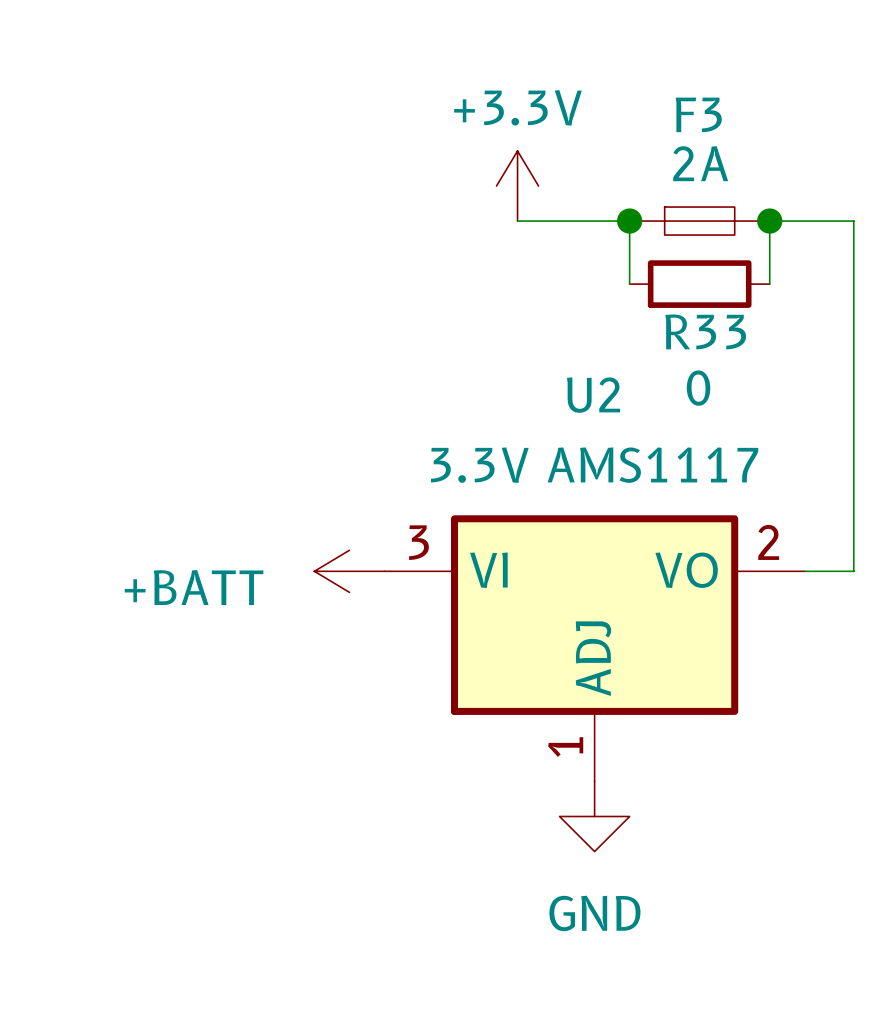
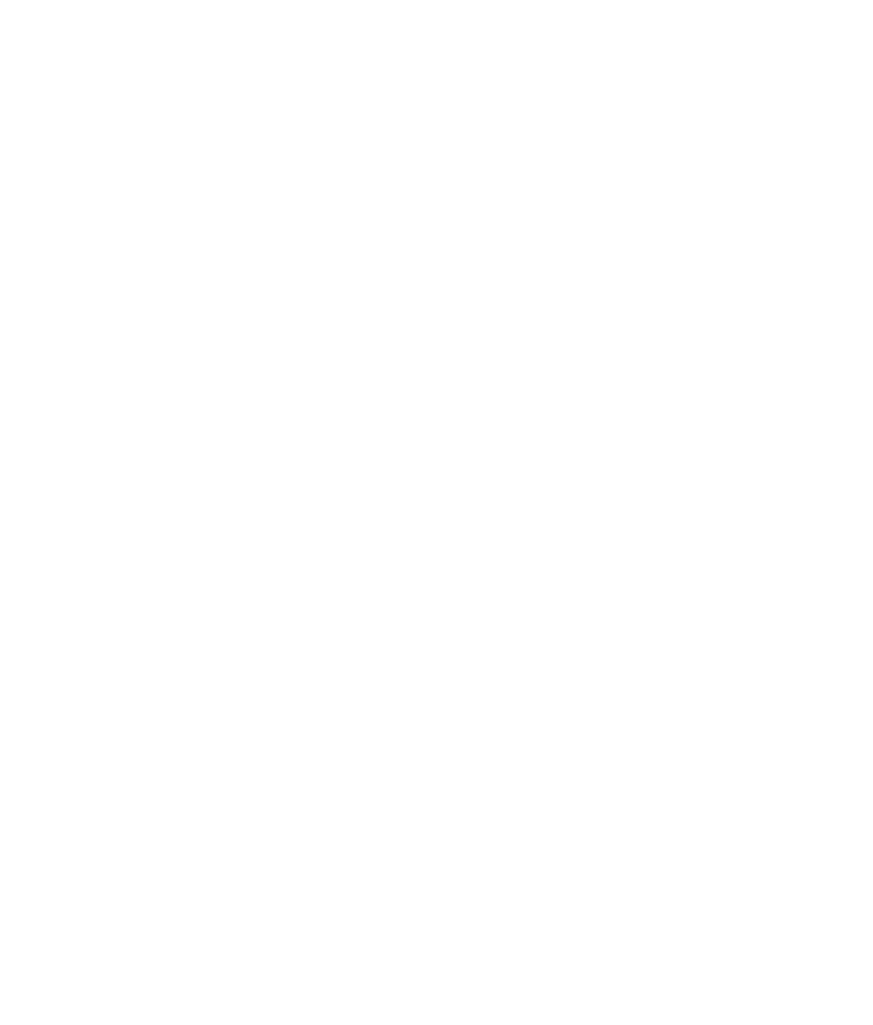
power symbol: +3.3V (517, 186) -> none
wire: (517, 221) (629, 221) (629, 284) -> none
junction: (629, 221) -> none
F3: 2A (699, 221) -> none
junction: (769, 221) -> none
R33: 0 (699, 284) -> none
wire: (769, 284) (769, 221) (853, 221) (853, 571) (804, 571) -> none
power symbol: +BATT (349, 571) -> none
U2: 3.3V AMS1117 (594, 648) -> none
power symbol: GND (594, 816) -> none

